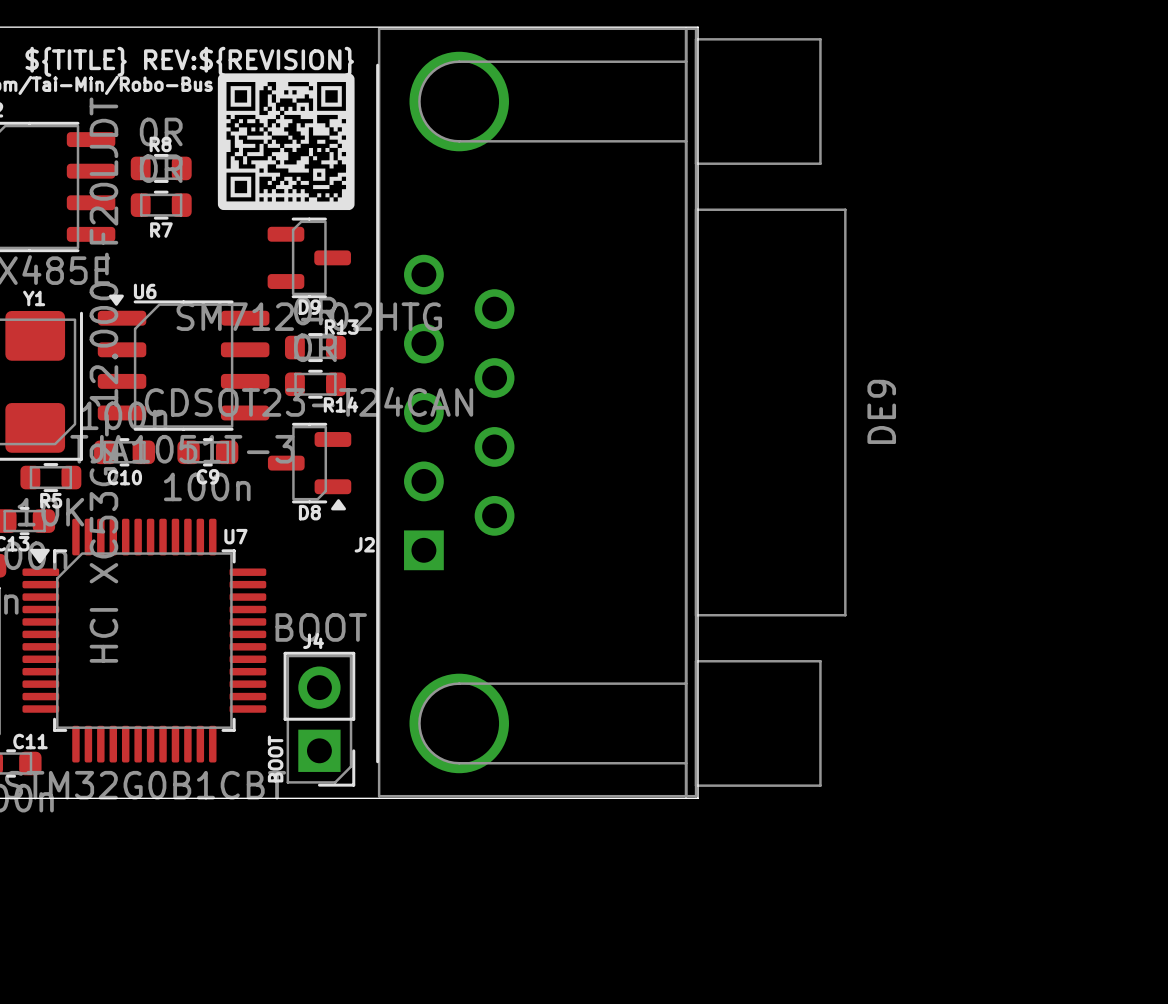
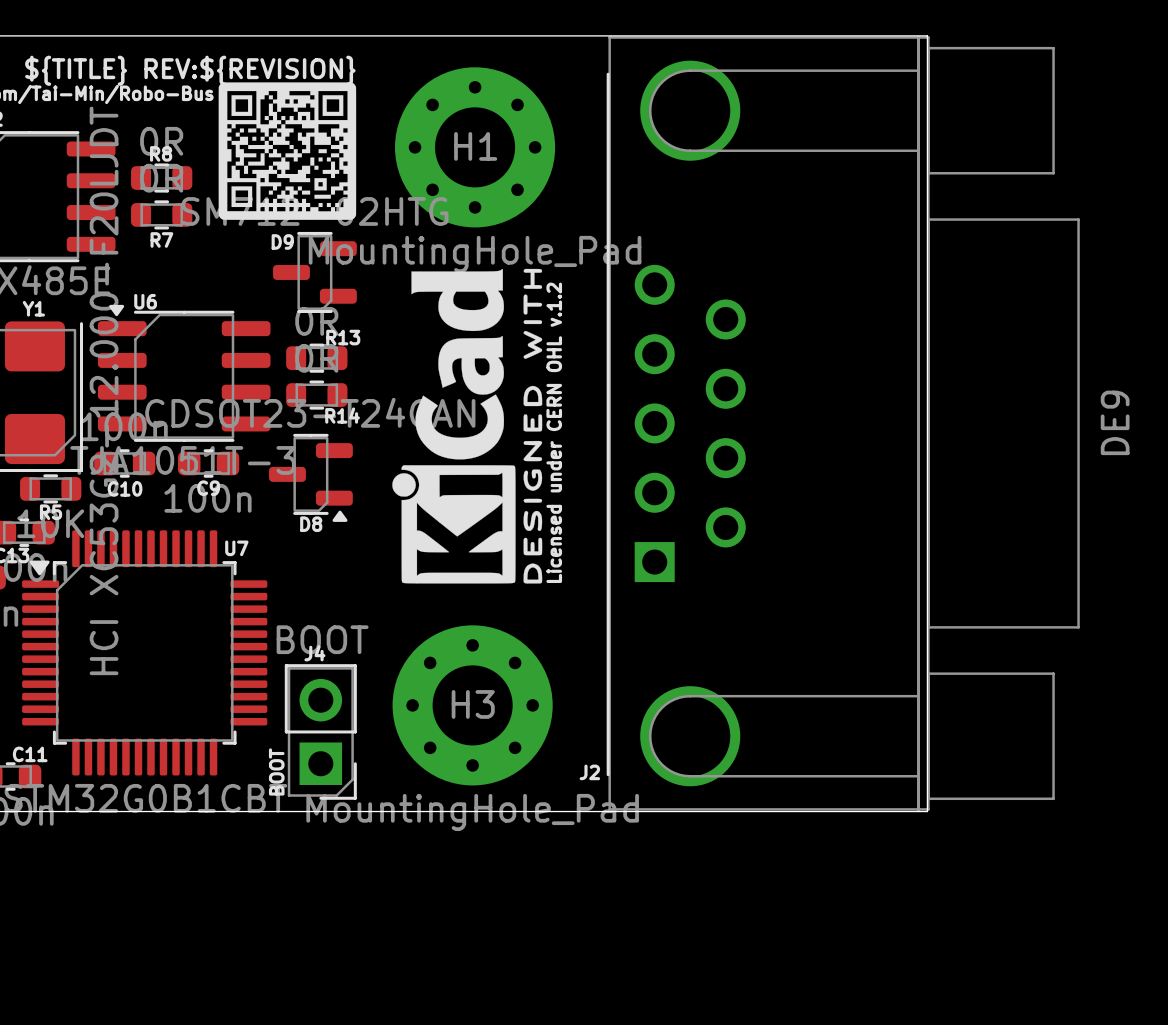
board edge: (698, 27) (698, 798) -> (701, 35) (927, 35) (927, 811) (701, 811)
H1: none -> MountingHole_Pad (475, 147)
D9 rotation: 0° (309, 257) -> 180° (314, 272)
drawing: none -> [392, 268, 543, 584]
J2 position: (611, 412) -> (843, 423)
text: none -> Licensed under CERN OHL v.1.2 (554, 432)
J2 name position: J2 (364, 544) -> J2 (589, 772)
H3: none -> MountingHole_Pad (472, 705)

